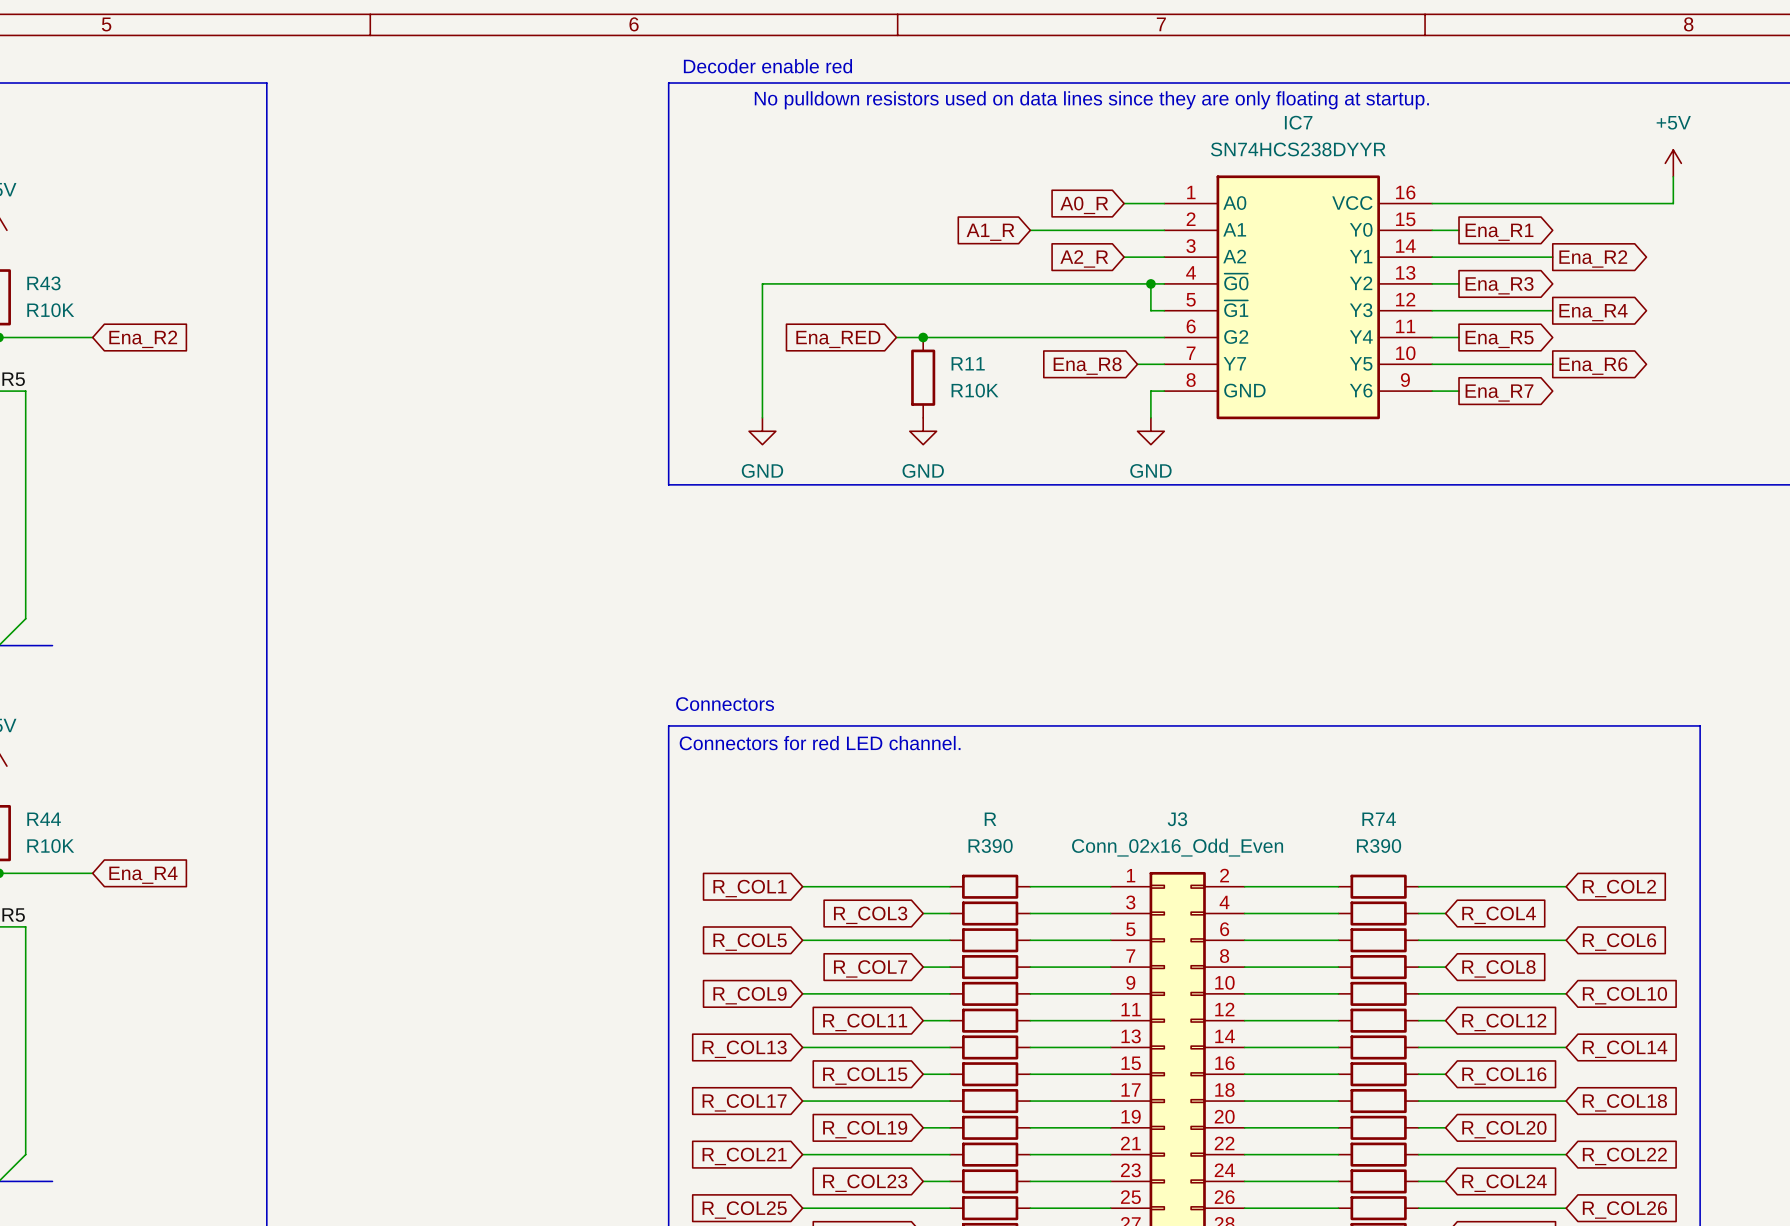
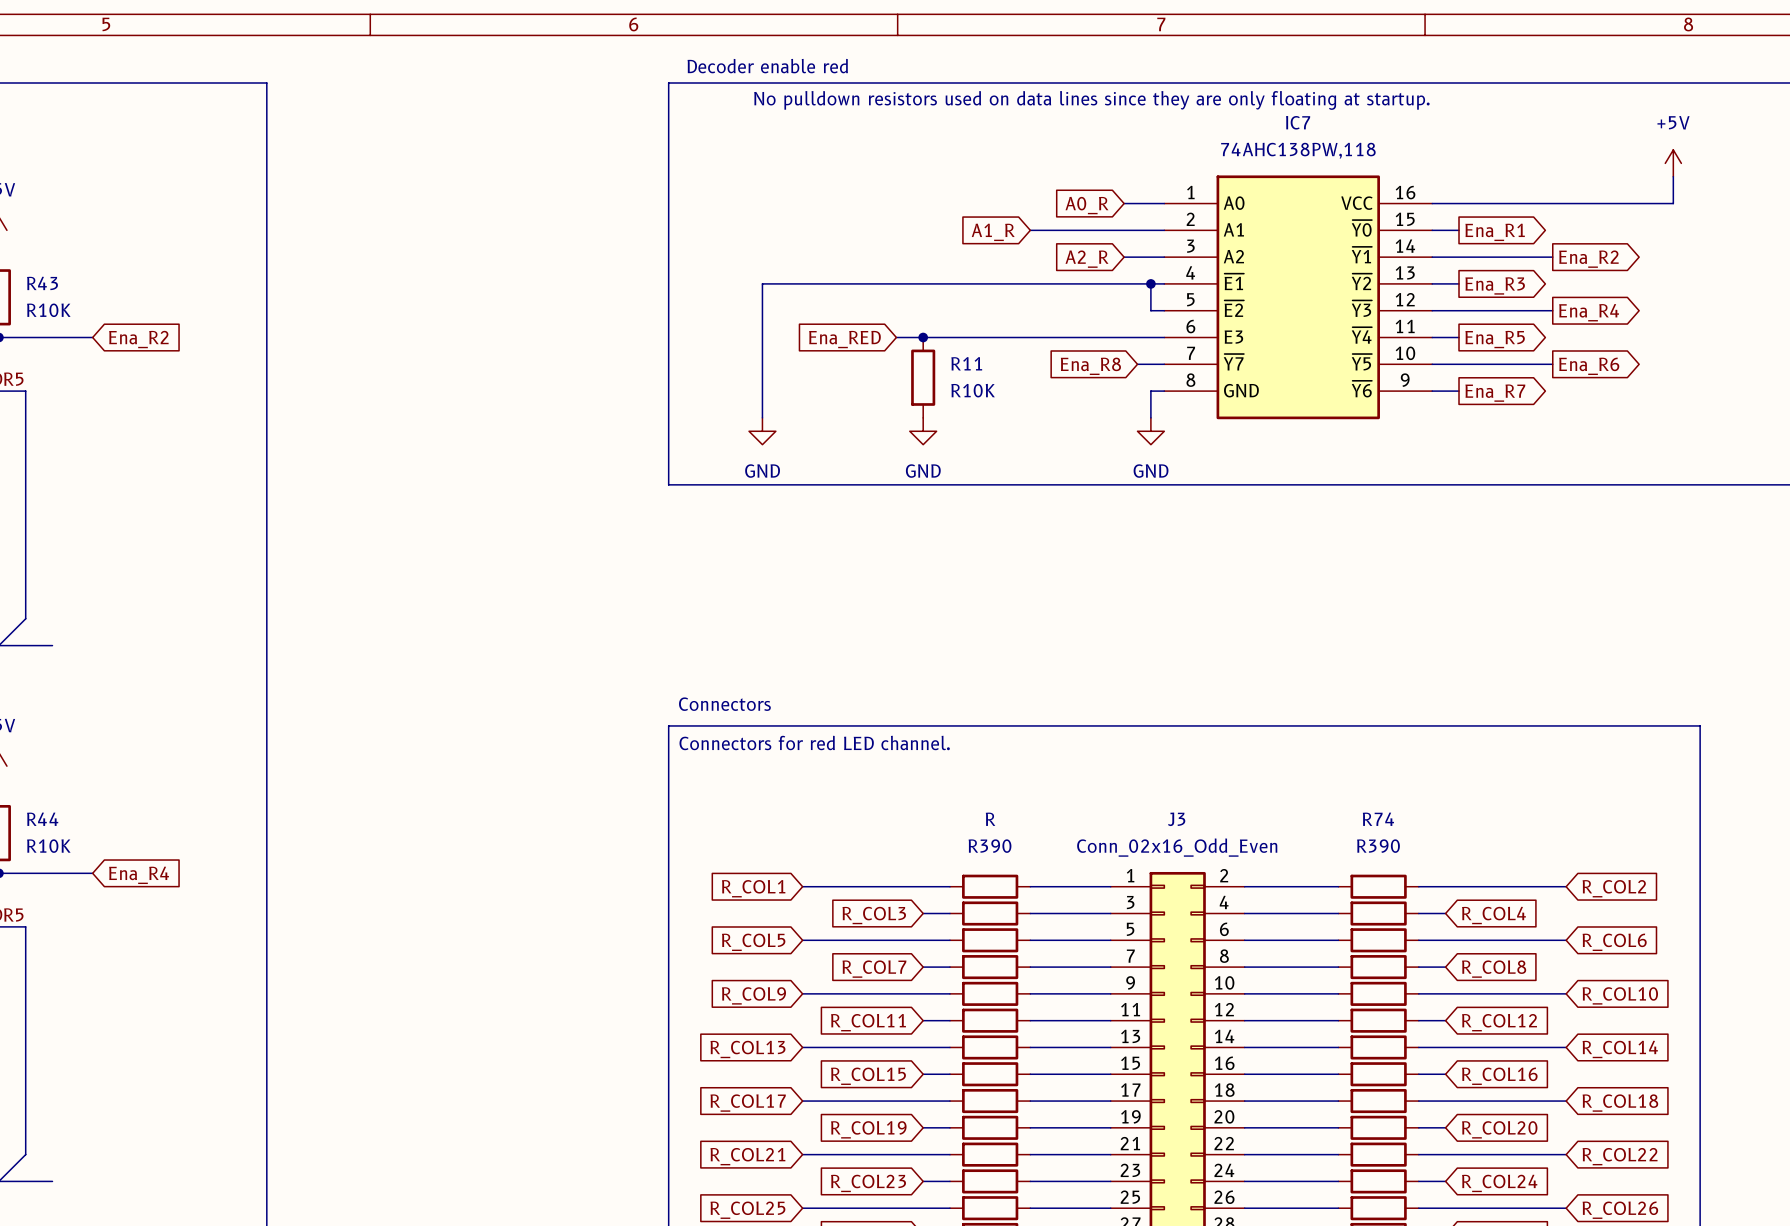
IC7 value: SN74HCS238DYYR (1298, 149) -> 74AHC138PW,118 (1298, 150)
IC7 symbol: [1164, 175, 1433, 420] -> [1164, 175, 1433, 420]

